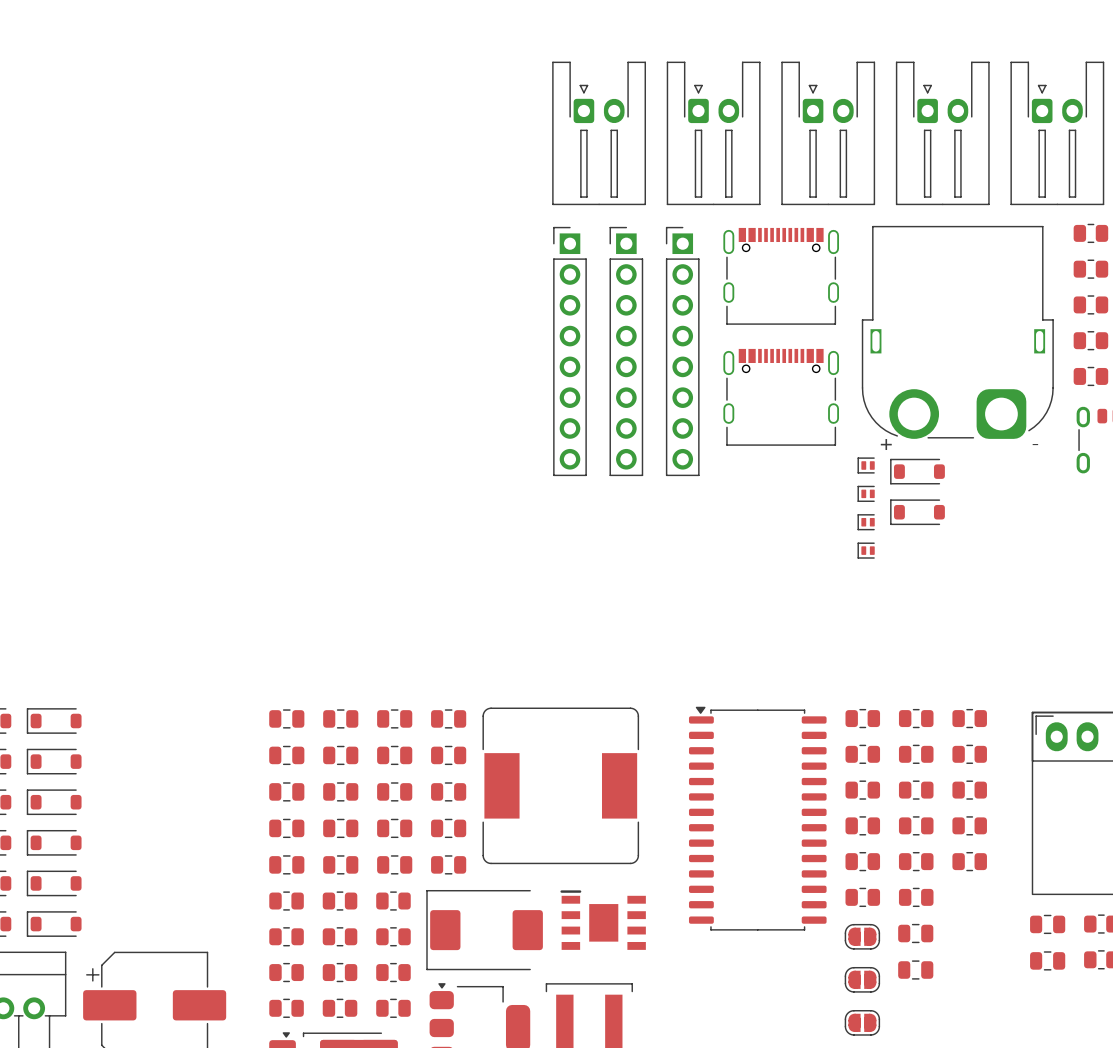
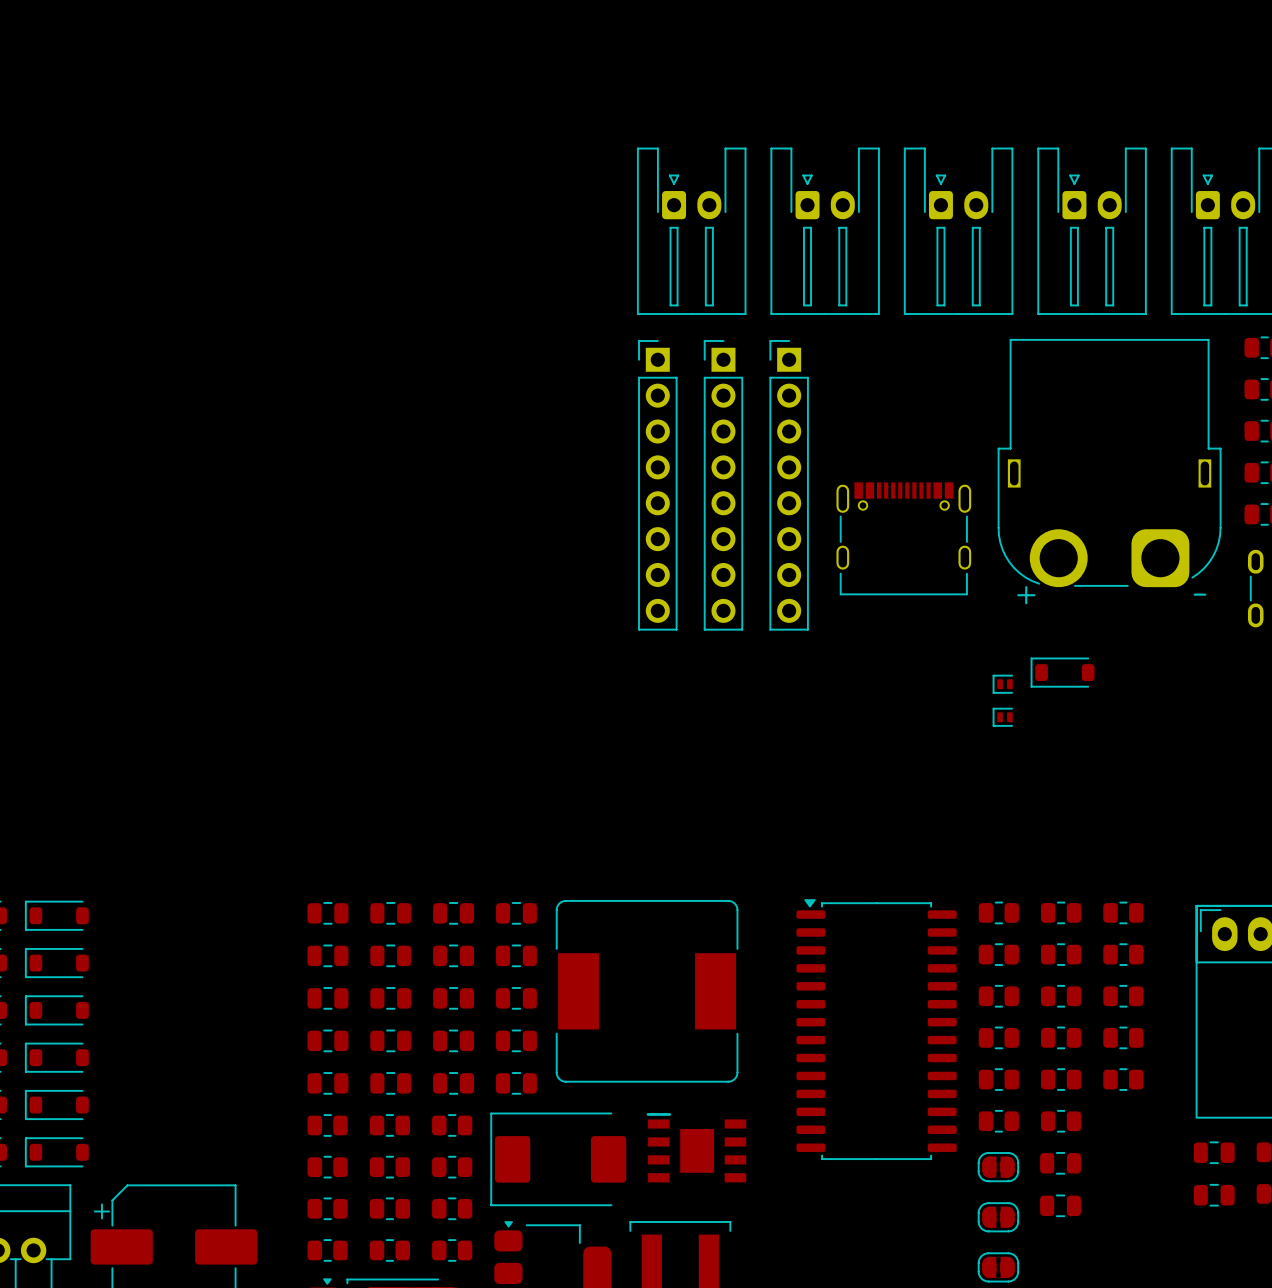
part: (781, 276) -> none
part: (866, 465) -> none
part: (917, 471) -> none
part: (866, 493) -> none

